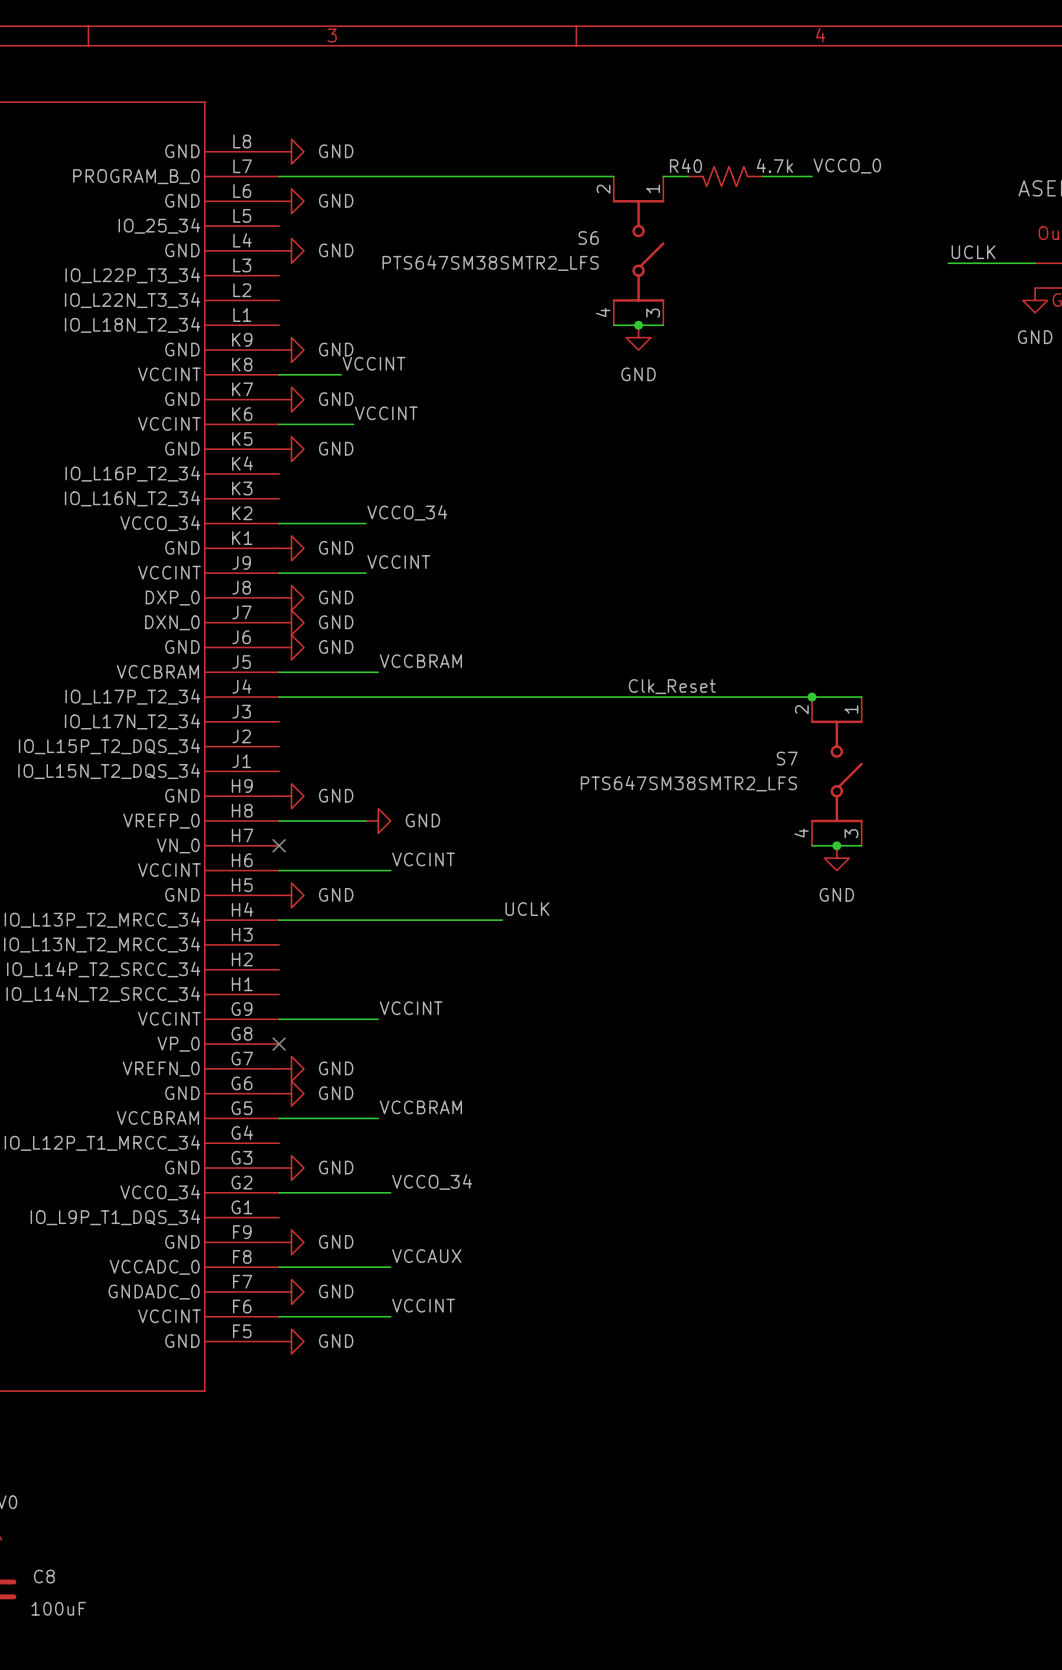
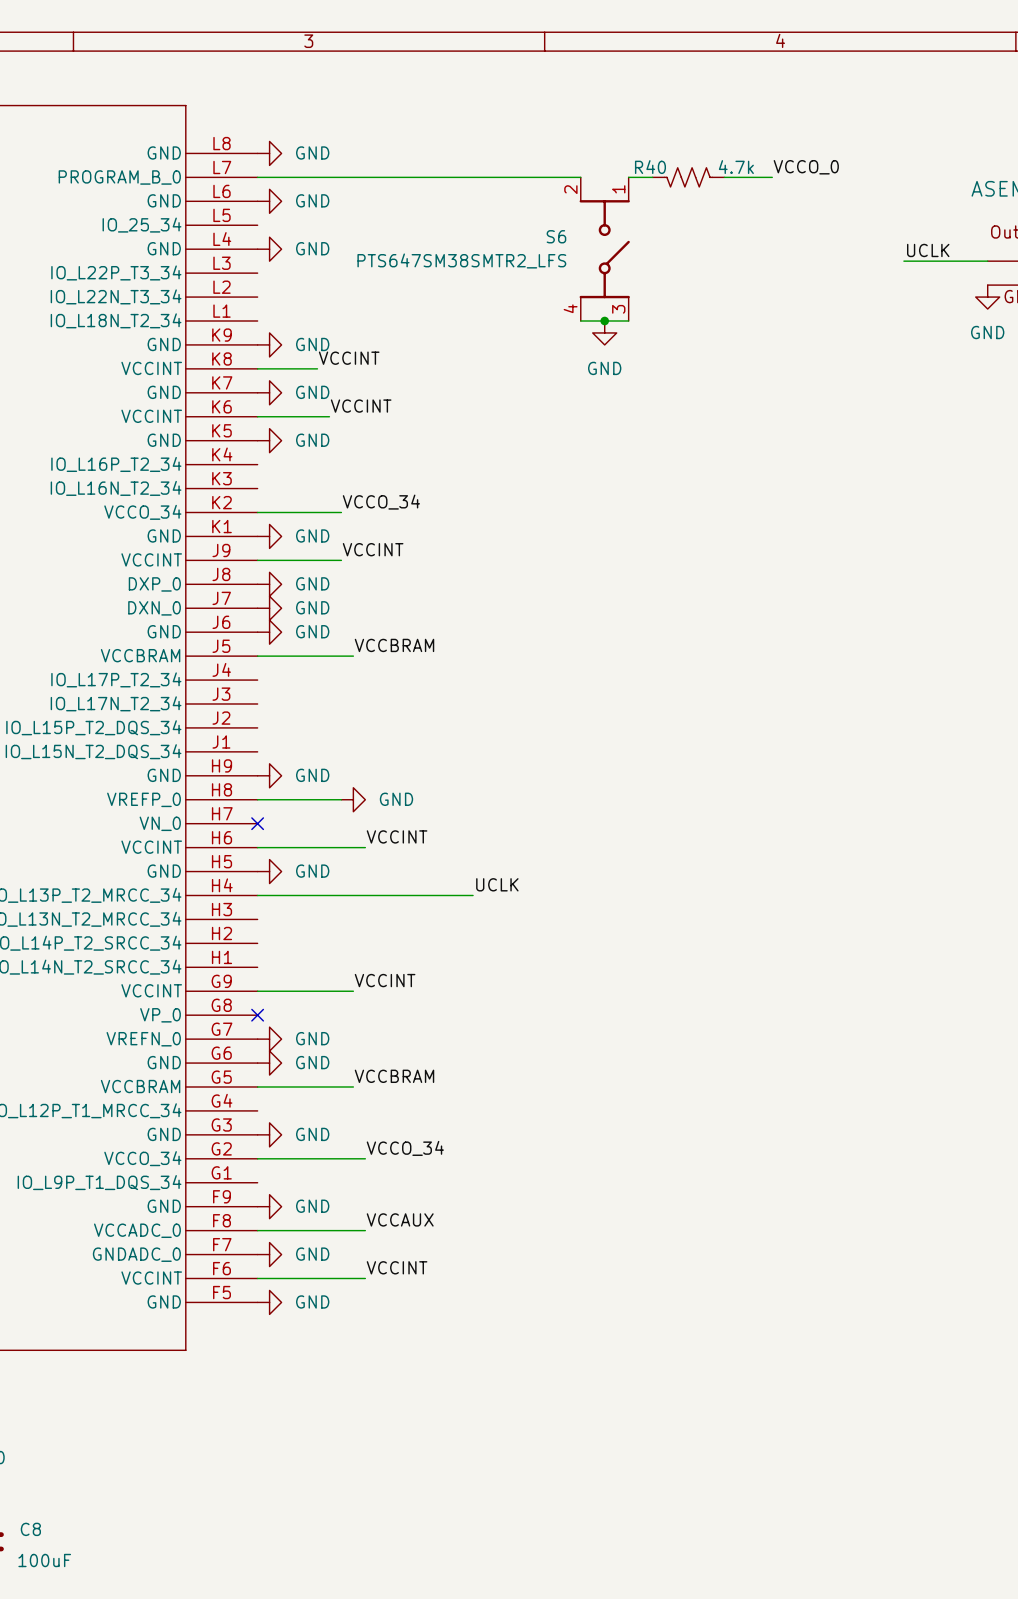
label: Clk_Reset (672, 686) -> none
wire: (279, 697) (861, 697) -> none
junction: (812, 697) -> none
S7: PTS647SM38SMTR2_LFS (836, 771) -> none
wire: (812, 845) (861, 845) -> none
junction: (836, 845) -> none
power symbol: GND (836, 858) -> none

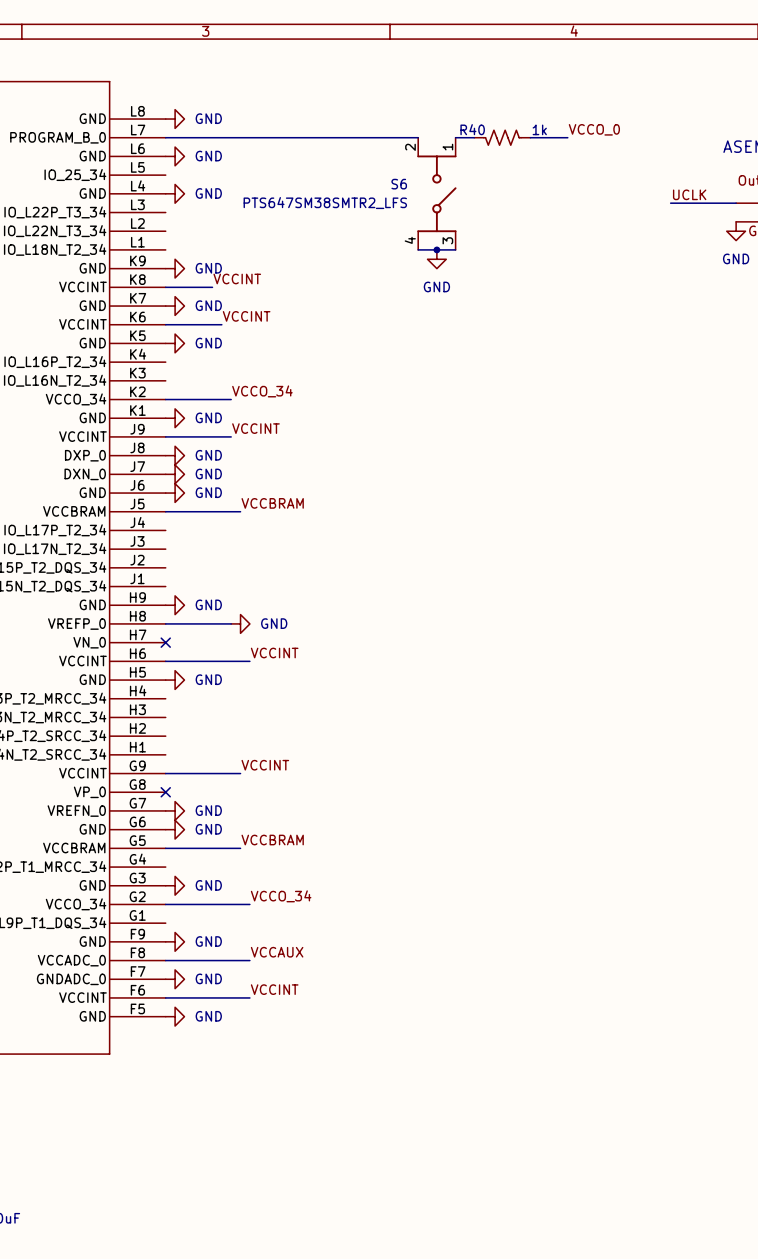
R40 value: 4.7k (736, 167) -> 1k (539, 129)
label: UCLK (497, 884) -> none
wire: (257, 895) (473, 895) -> none

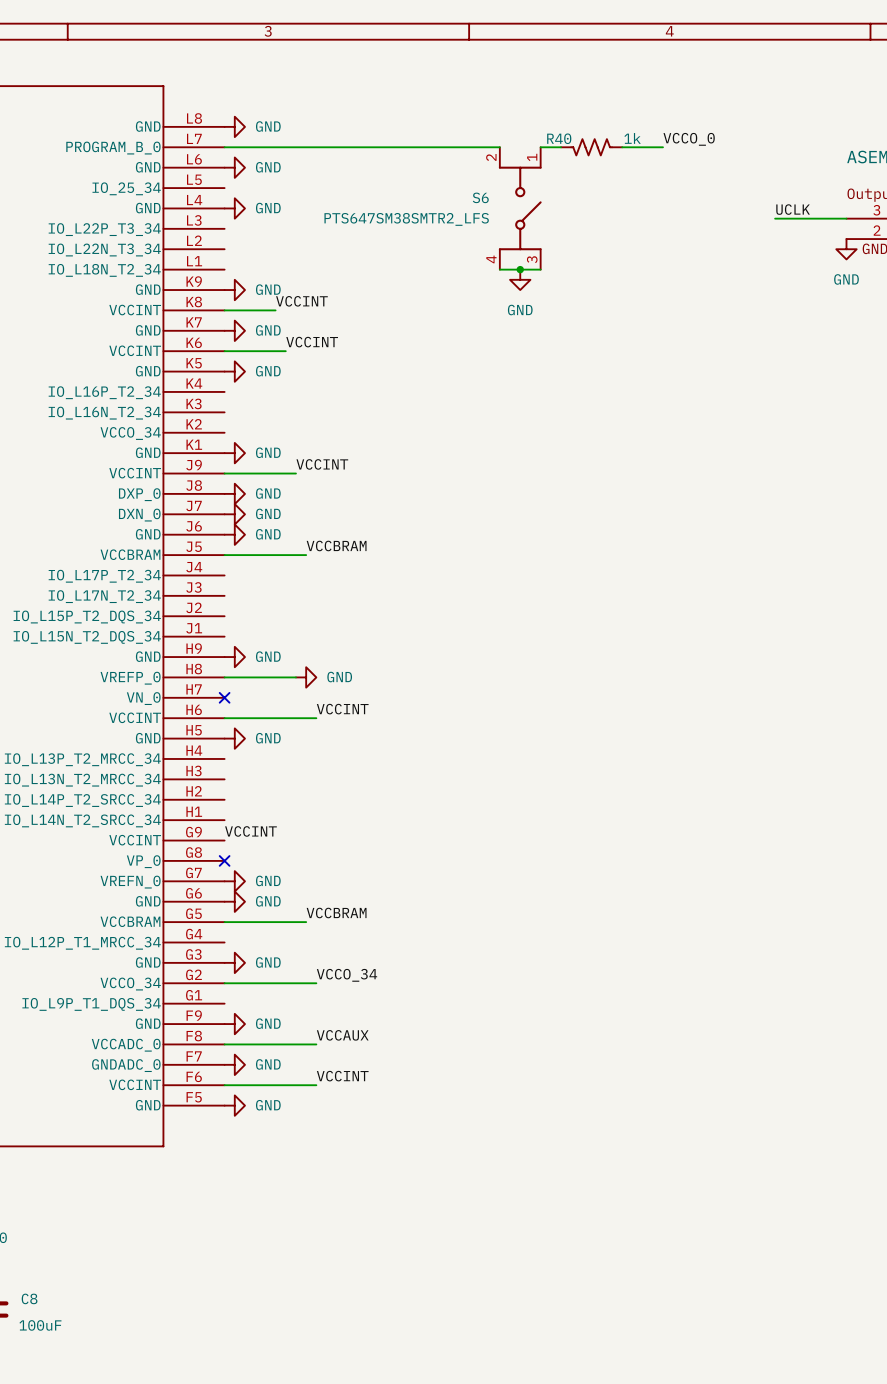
label: VCCO_34 (262, 391) -> none
wire: (165, 399) (231, 399) -> none
label position: VCCINT (265, 765) -> VCCINT (250, 831)
wire: (165, 773) (240, 773) -> none

